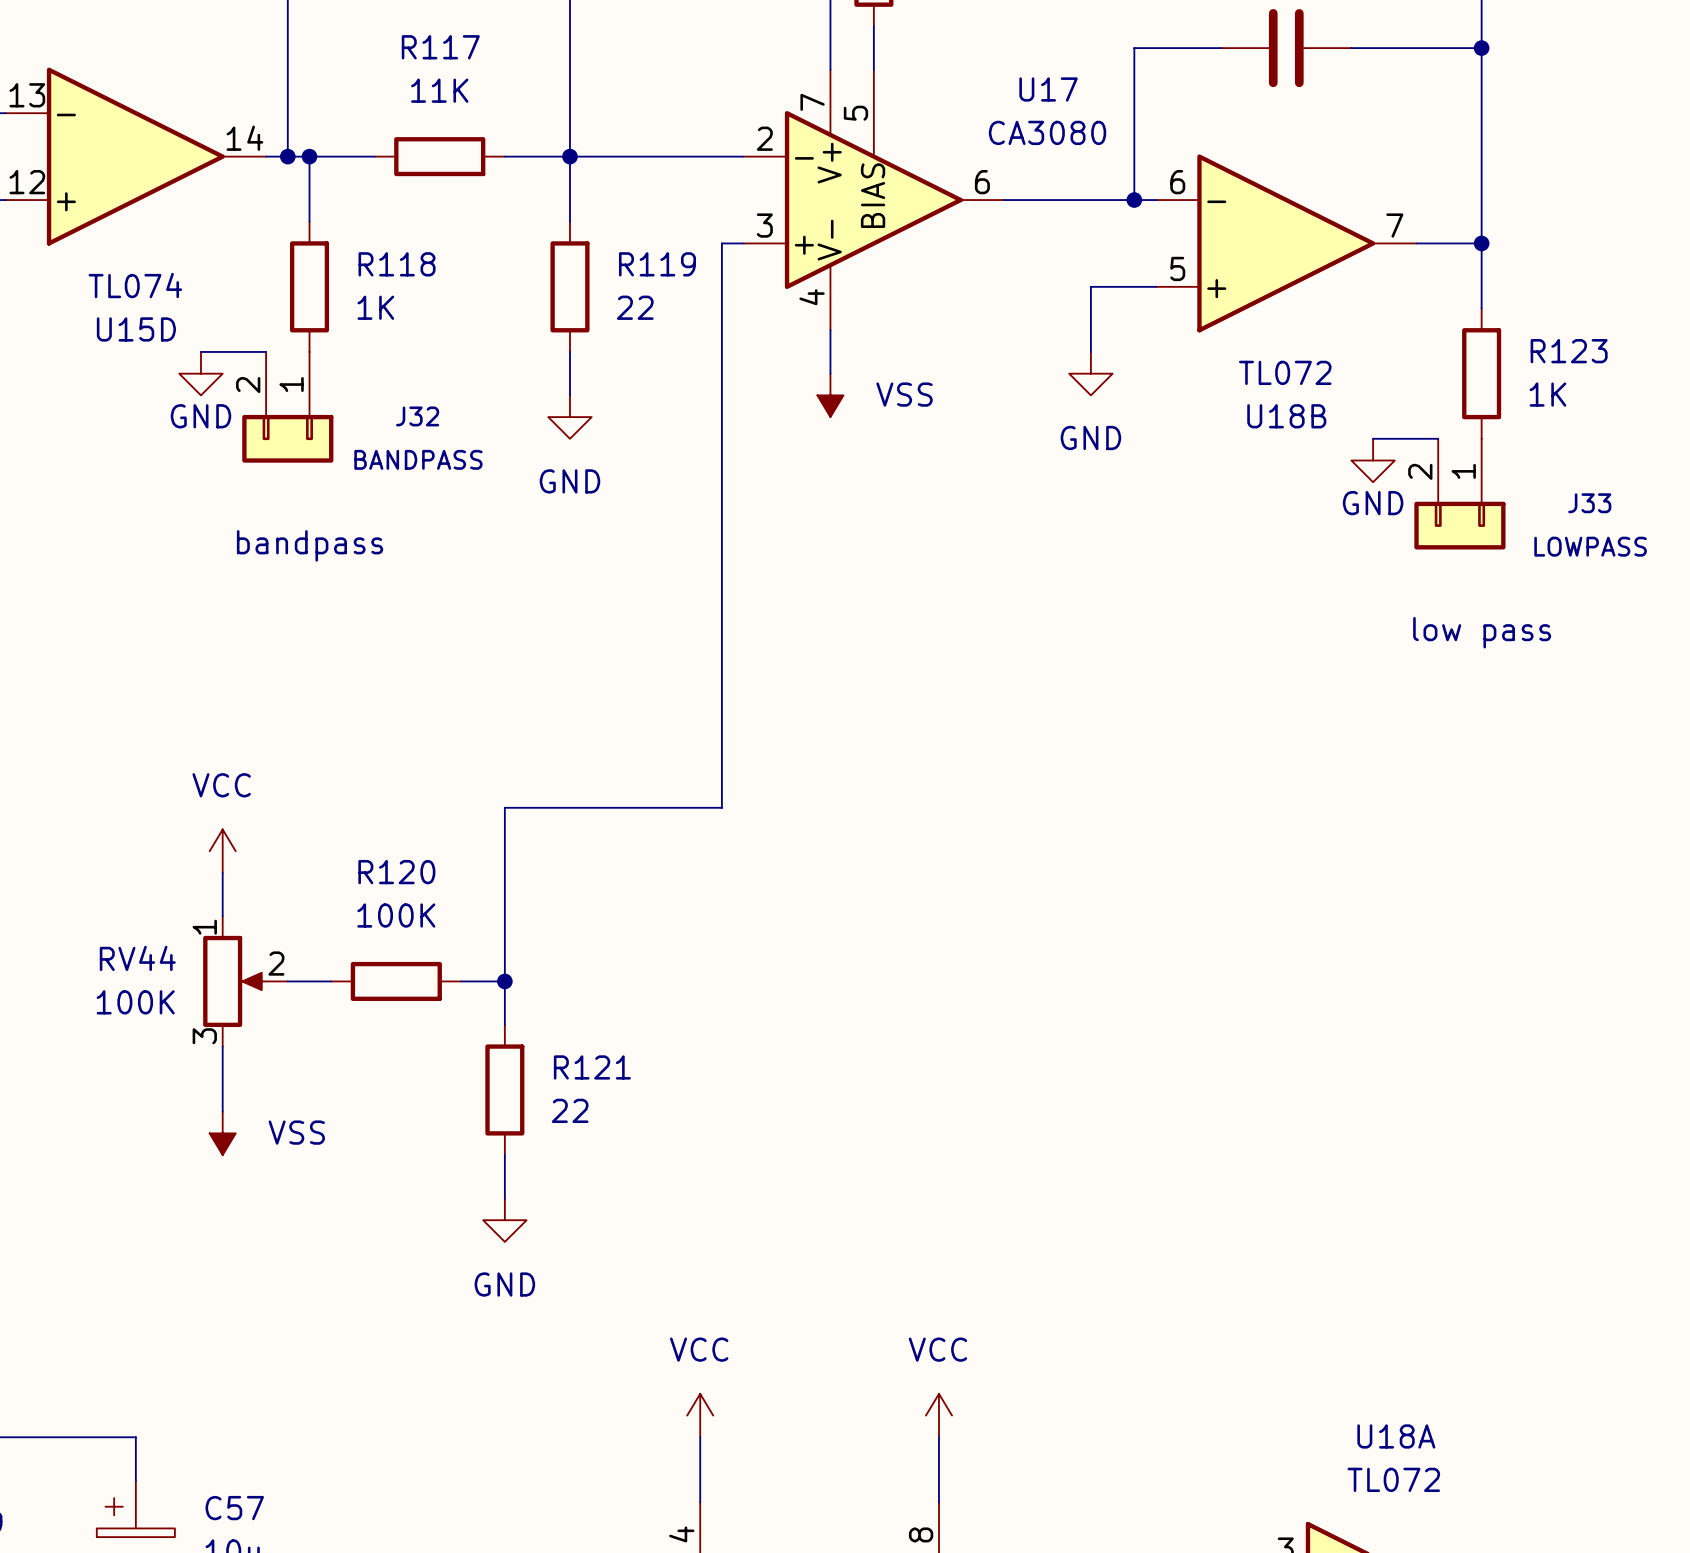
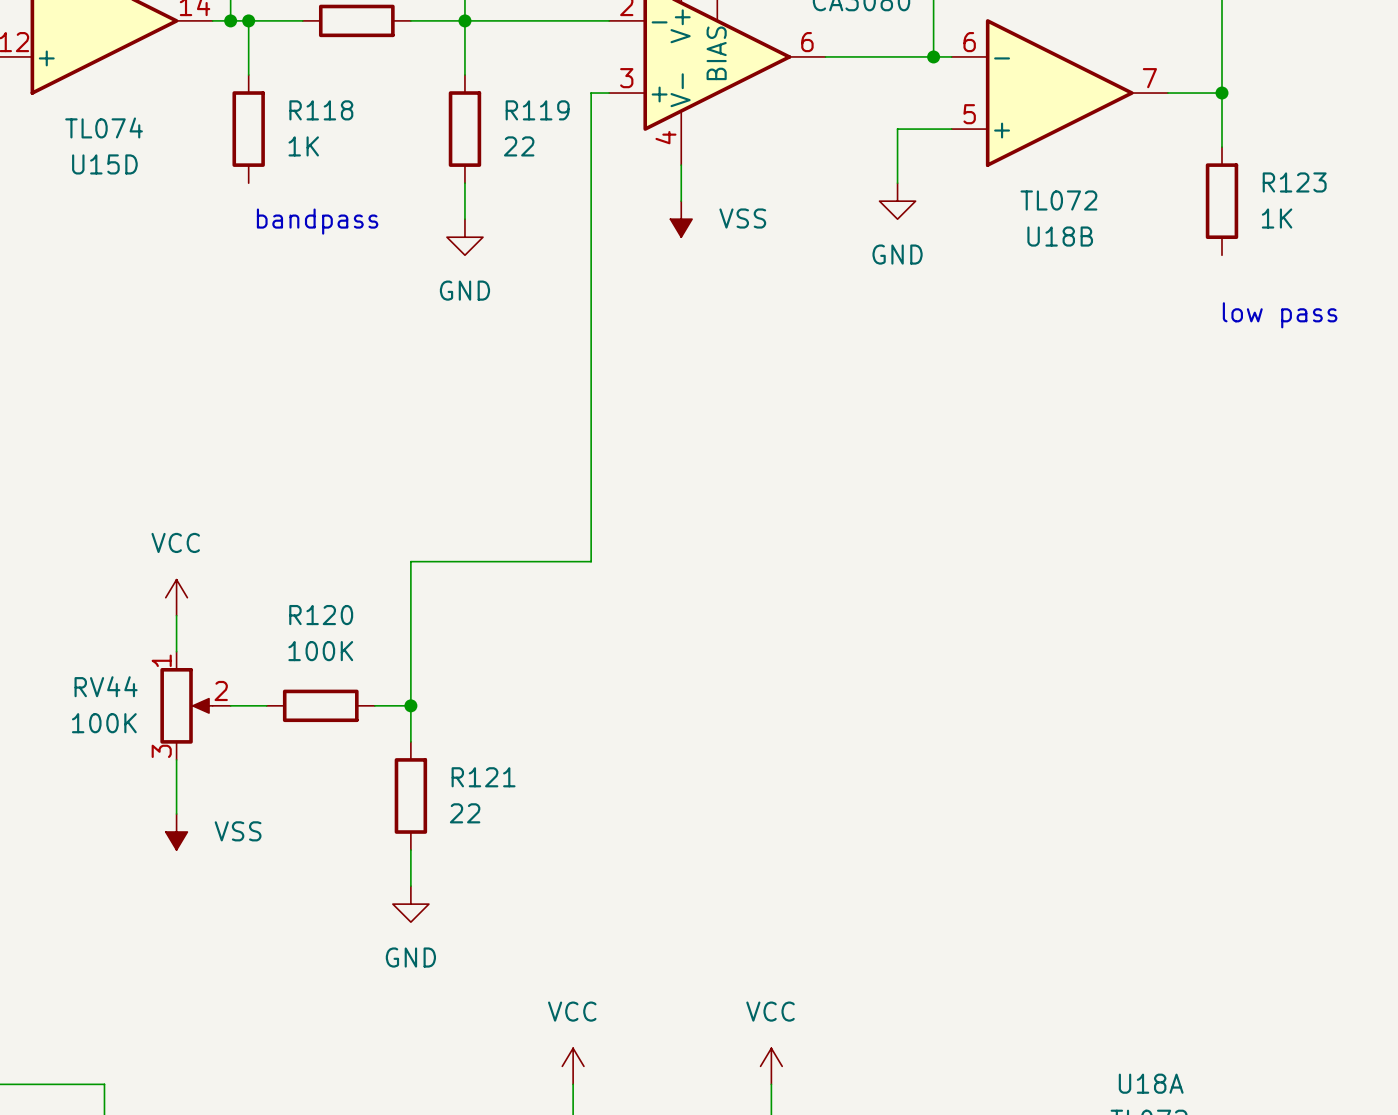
wire: (200, 351) (266, 351) -> none
power symbol: GND (200, 373) -> none
J32: BANDPASS (287, 407) -> none
wire: (1373, 438) (1438, 438) -> none
power symbol: GND (1373, 460) -> none
J33: LOWPASS (1459, 494) -> none
text position: bandpass (310, 545) -> bandpass (317, 221)
text position: low pass (1482, 632) -> low pass (1280, 315)

